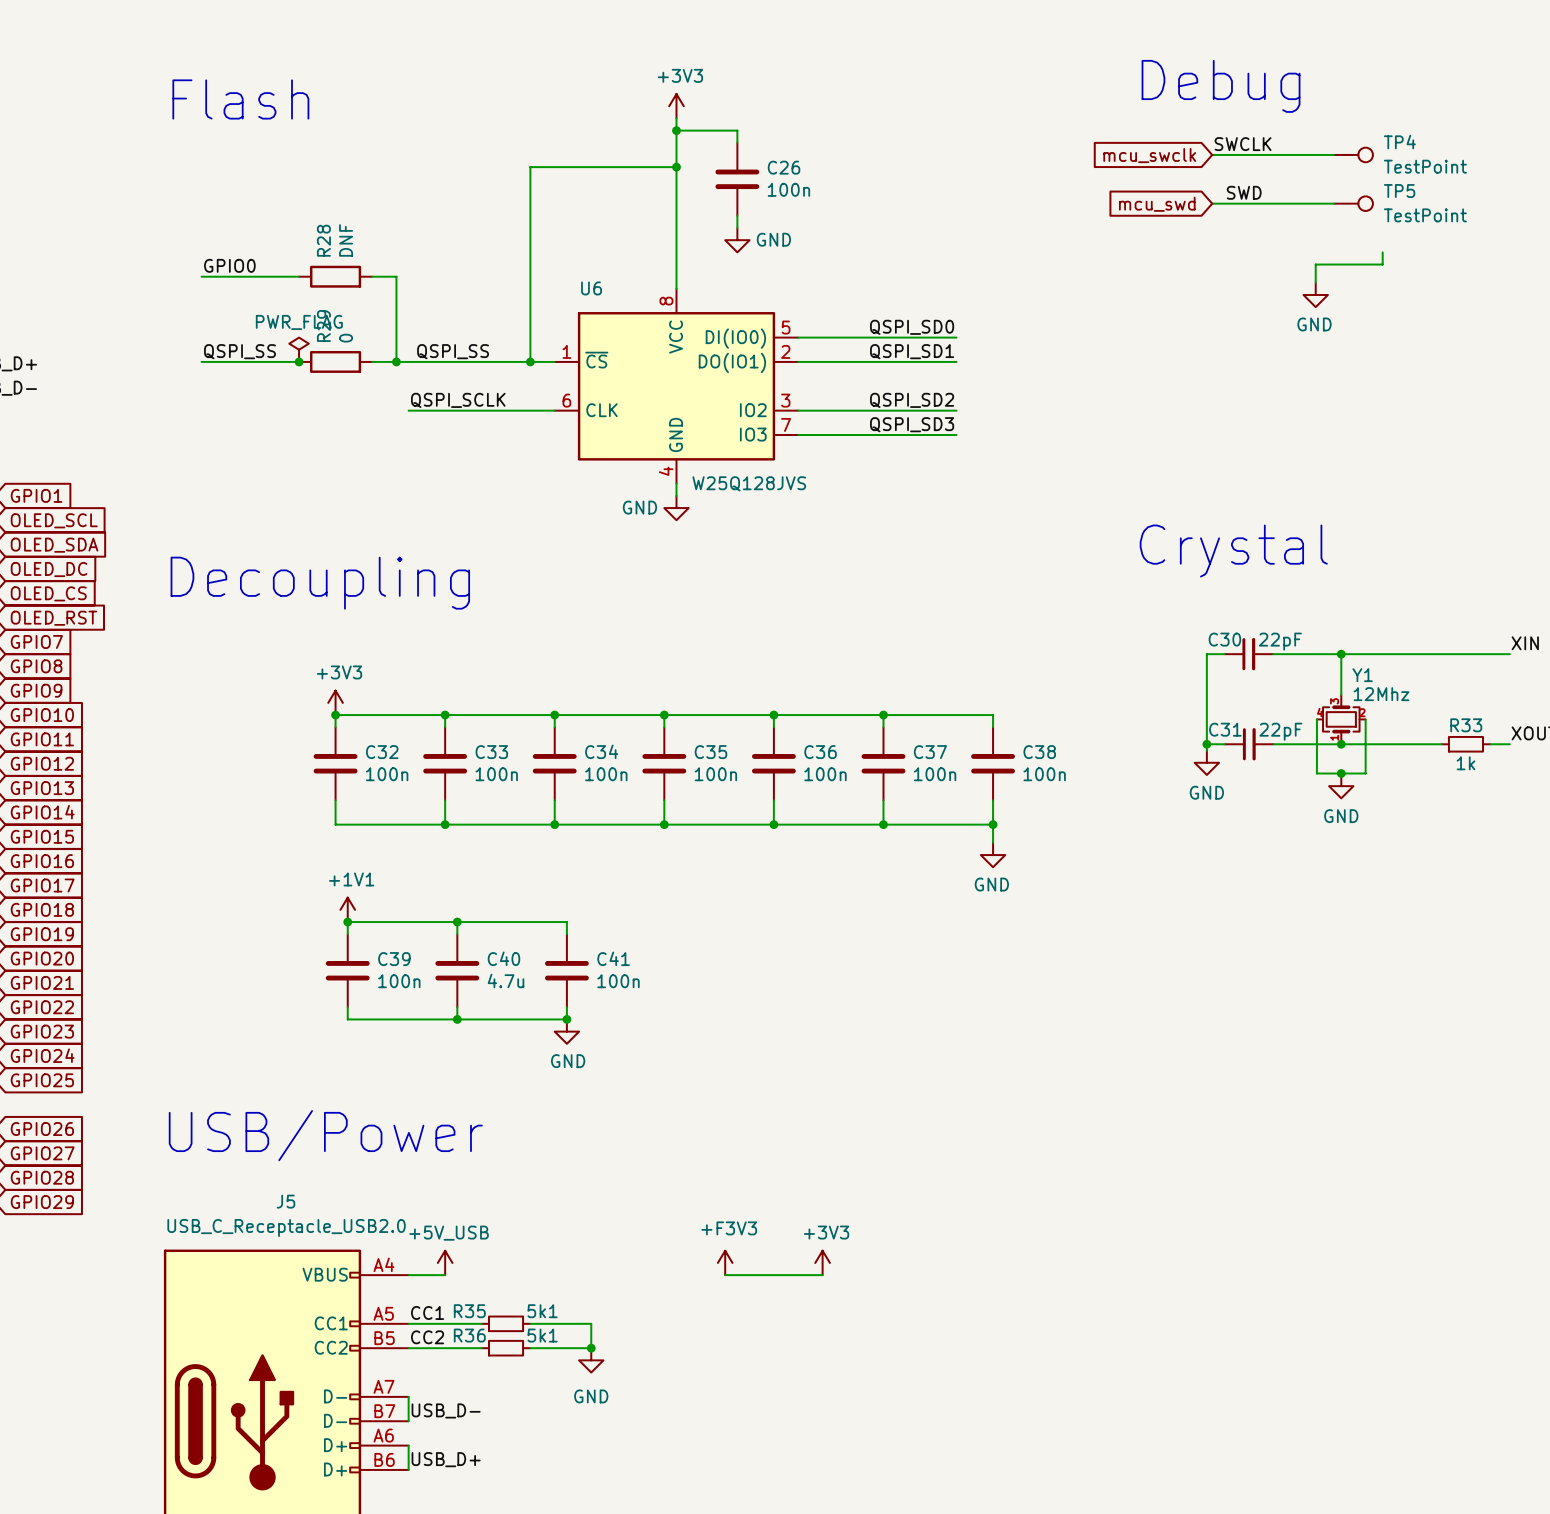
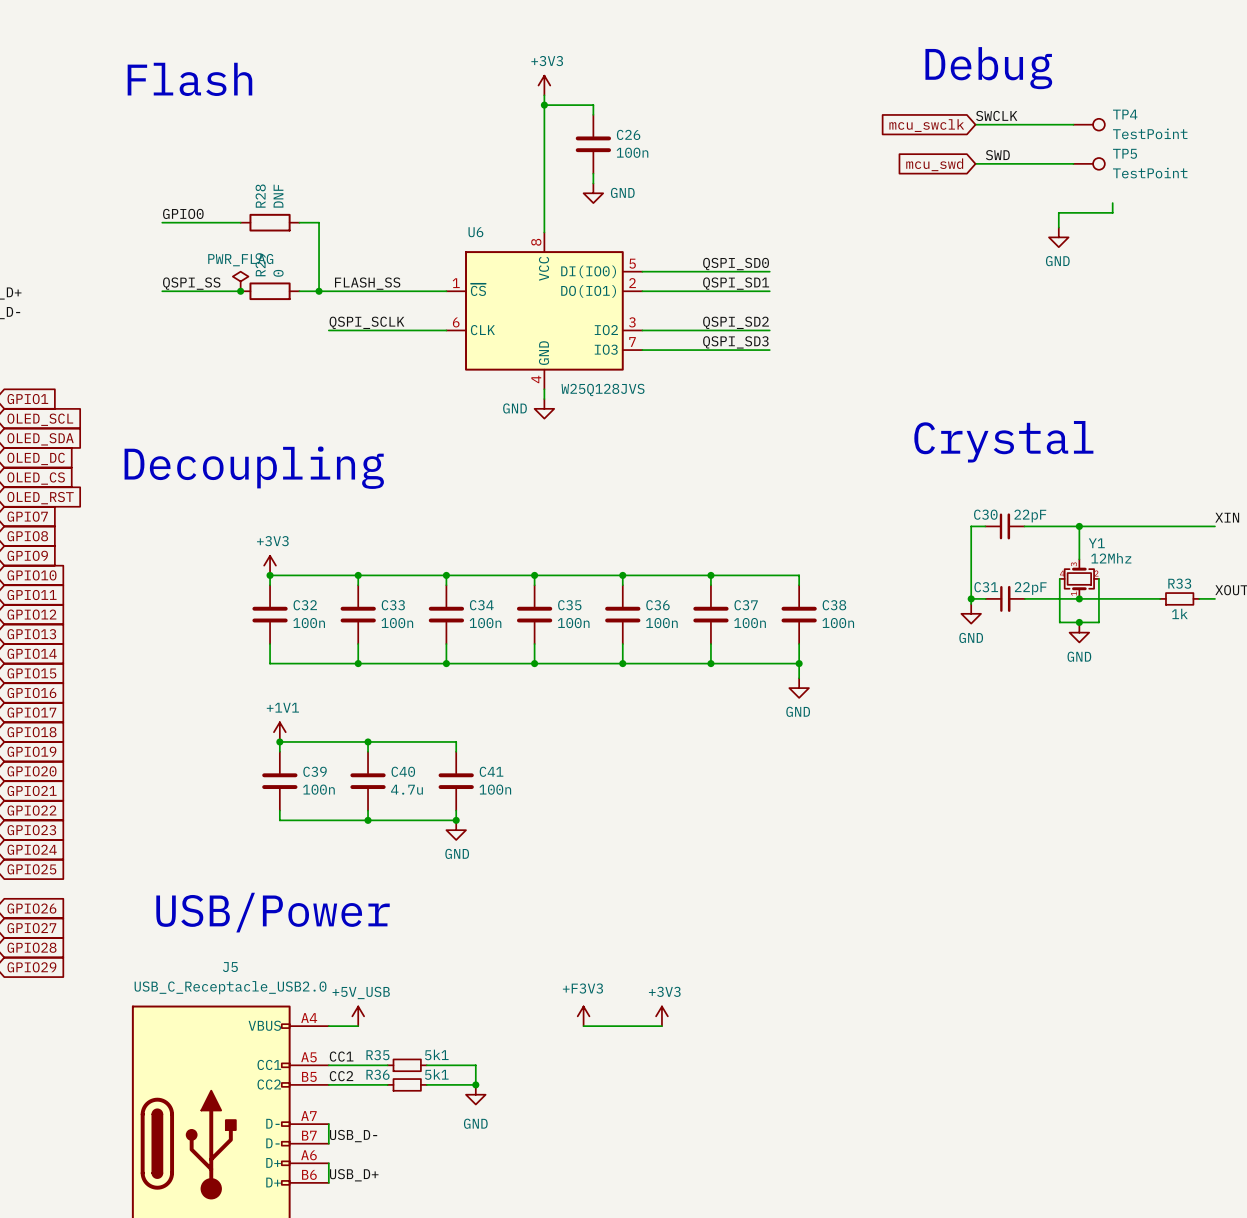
wire: (676, 167) (530, 167) (530, 361) -> none
junction: (676, 167) -> none
label: QSPI_SS (453, 351) -> FLASH_SS (367, 283)
junction: (530, 361) -> none

